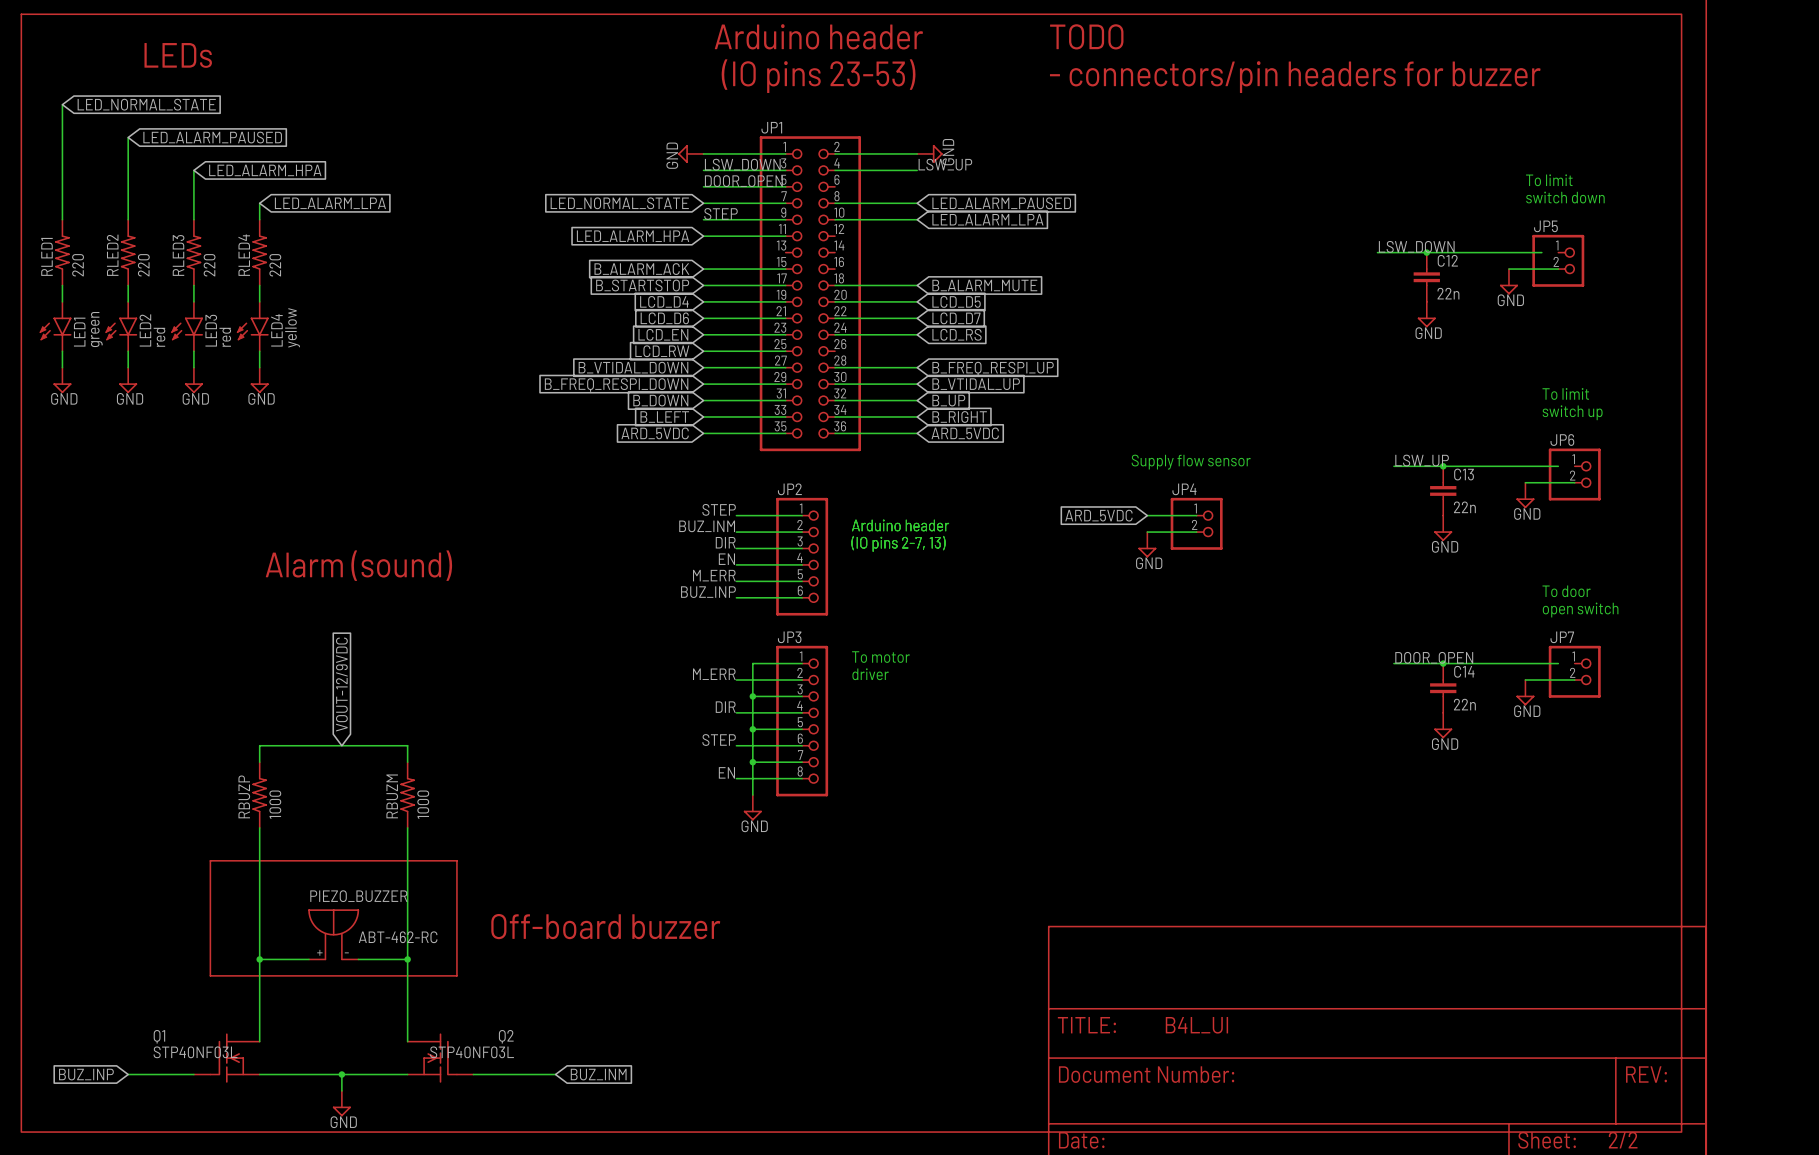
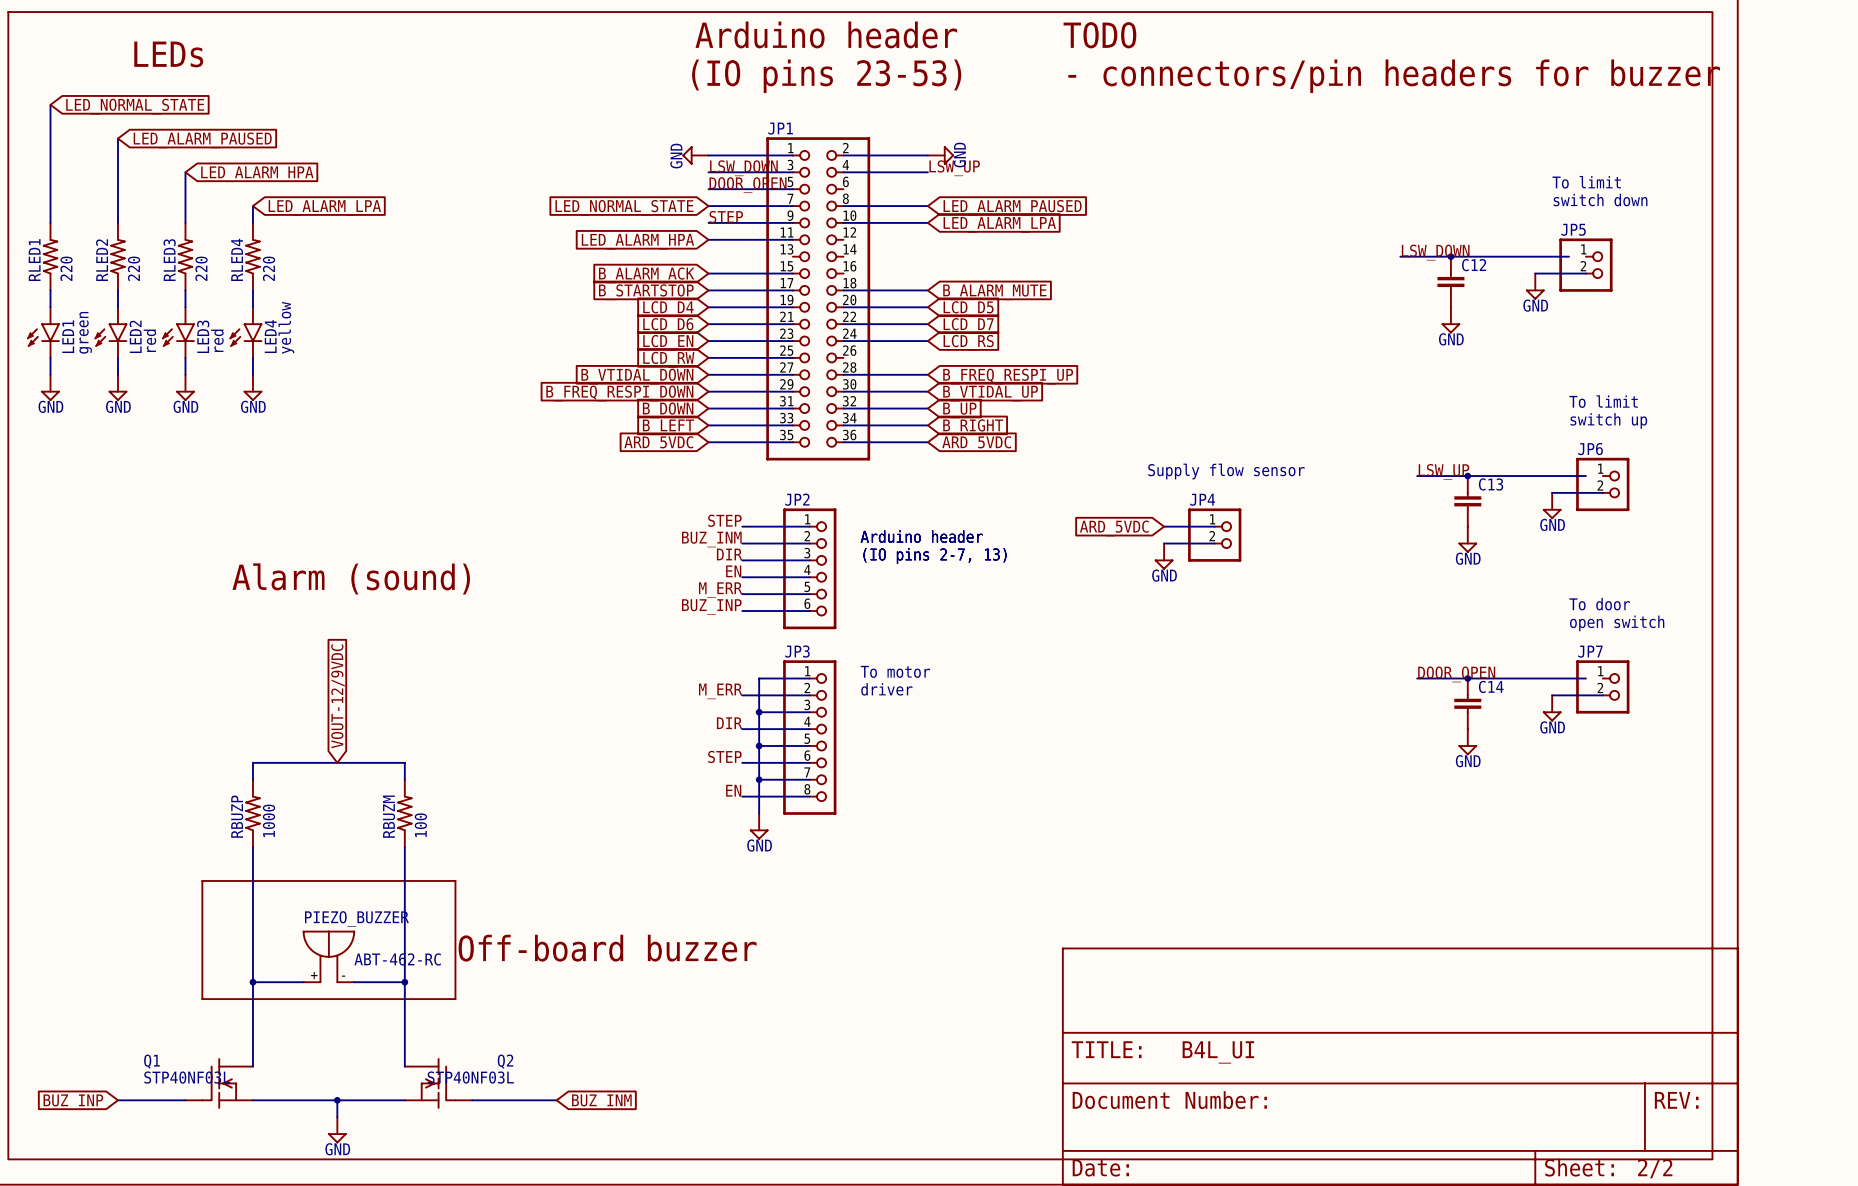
C12 value: 22n (1448, 293) -> none
C13 value: 22n (1464, 507) -> none
C14 value: 22n (1464, 704) -> none
RBUZM value: 1000 (423, 804) -> 100 (420, 825)

